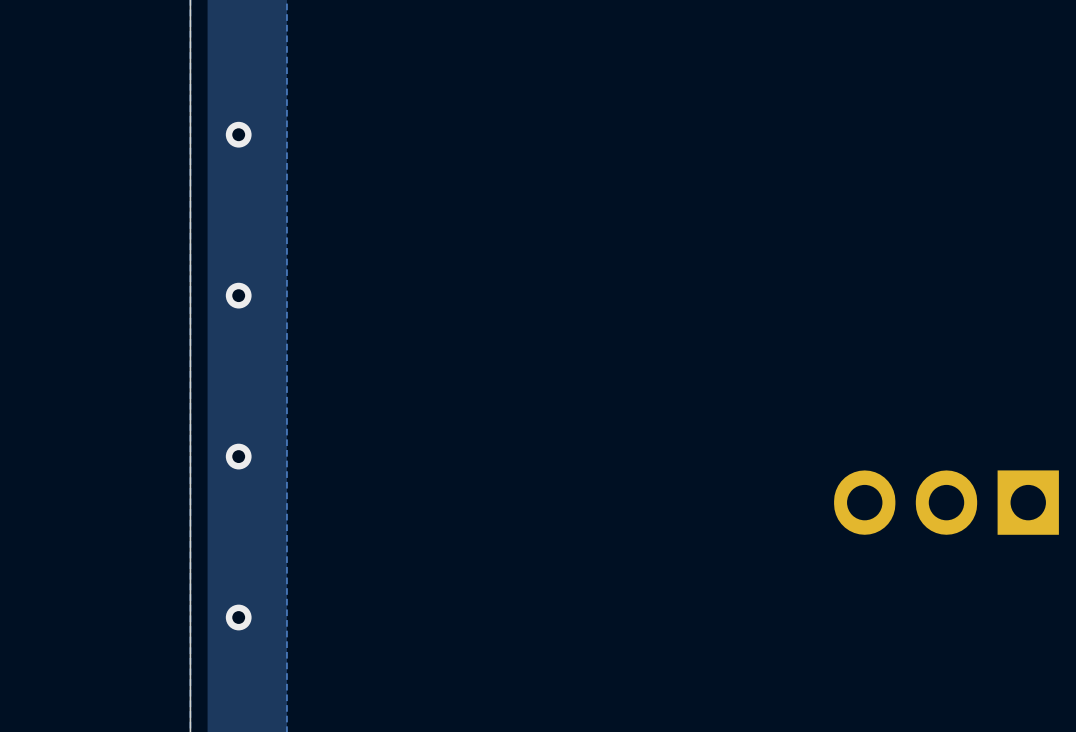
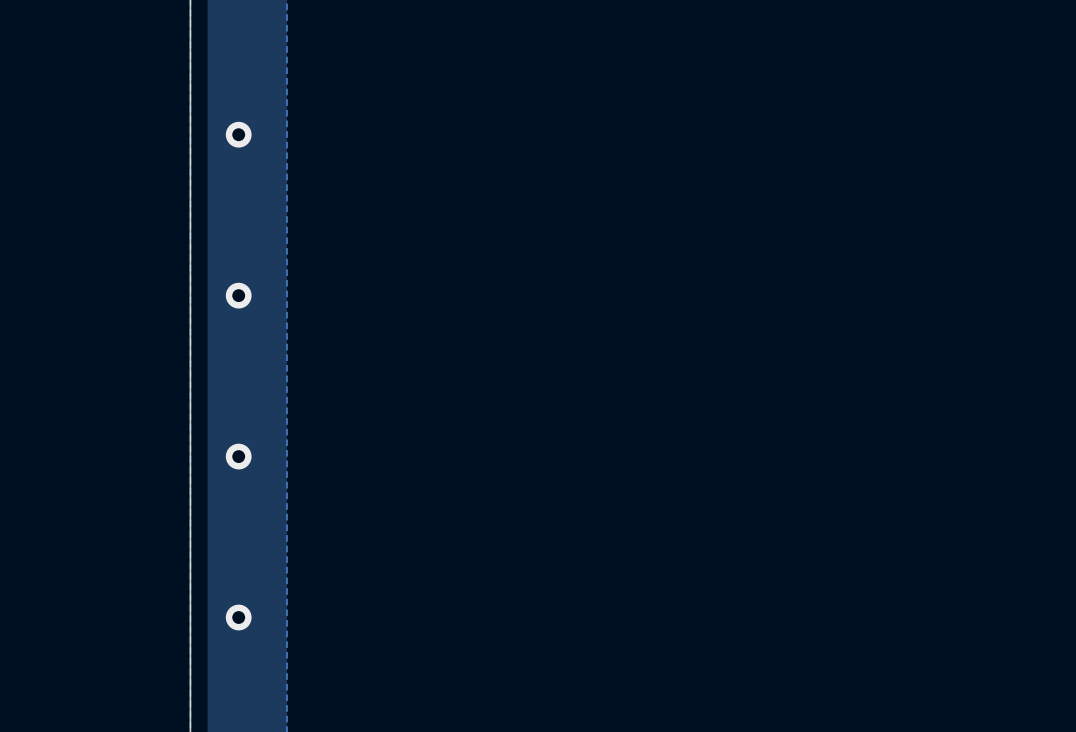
part: (946, 502) -> none

